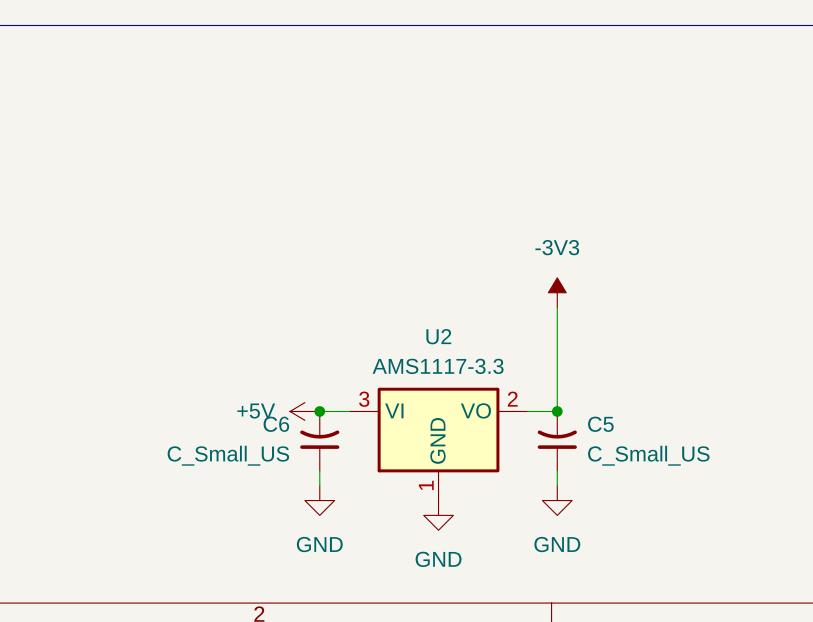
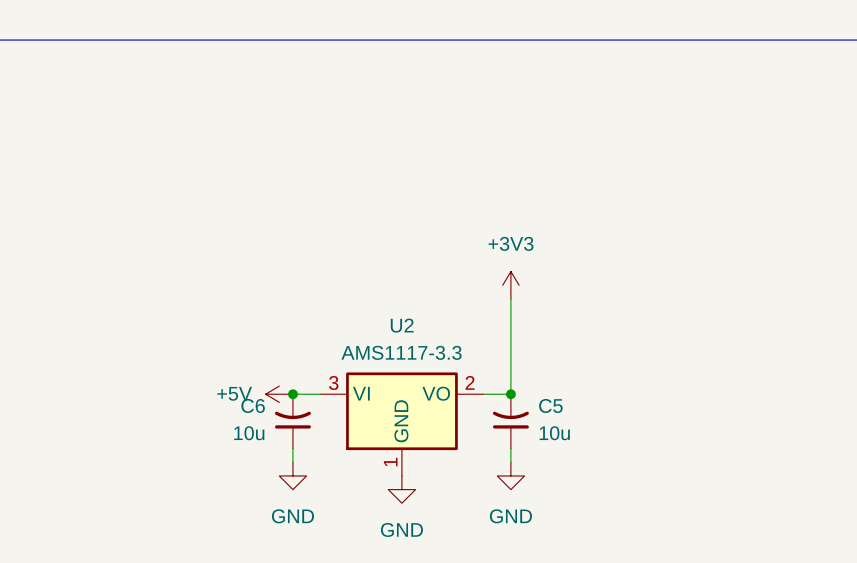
power symbol: -3V3 (557, 292) -> +3V3 (510, 285)
C6 value: C_Small_US (228, 455) -> 10u (249, 433)
C5 value: C_Small_US (648, 455) -> 10u (554, 433)

